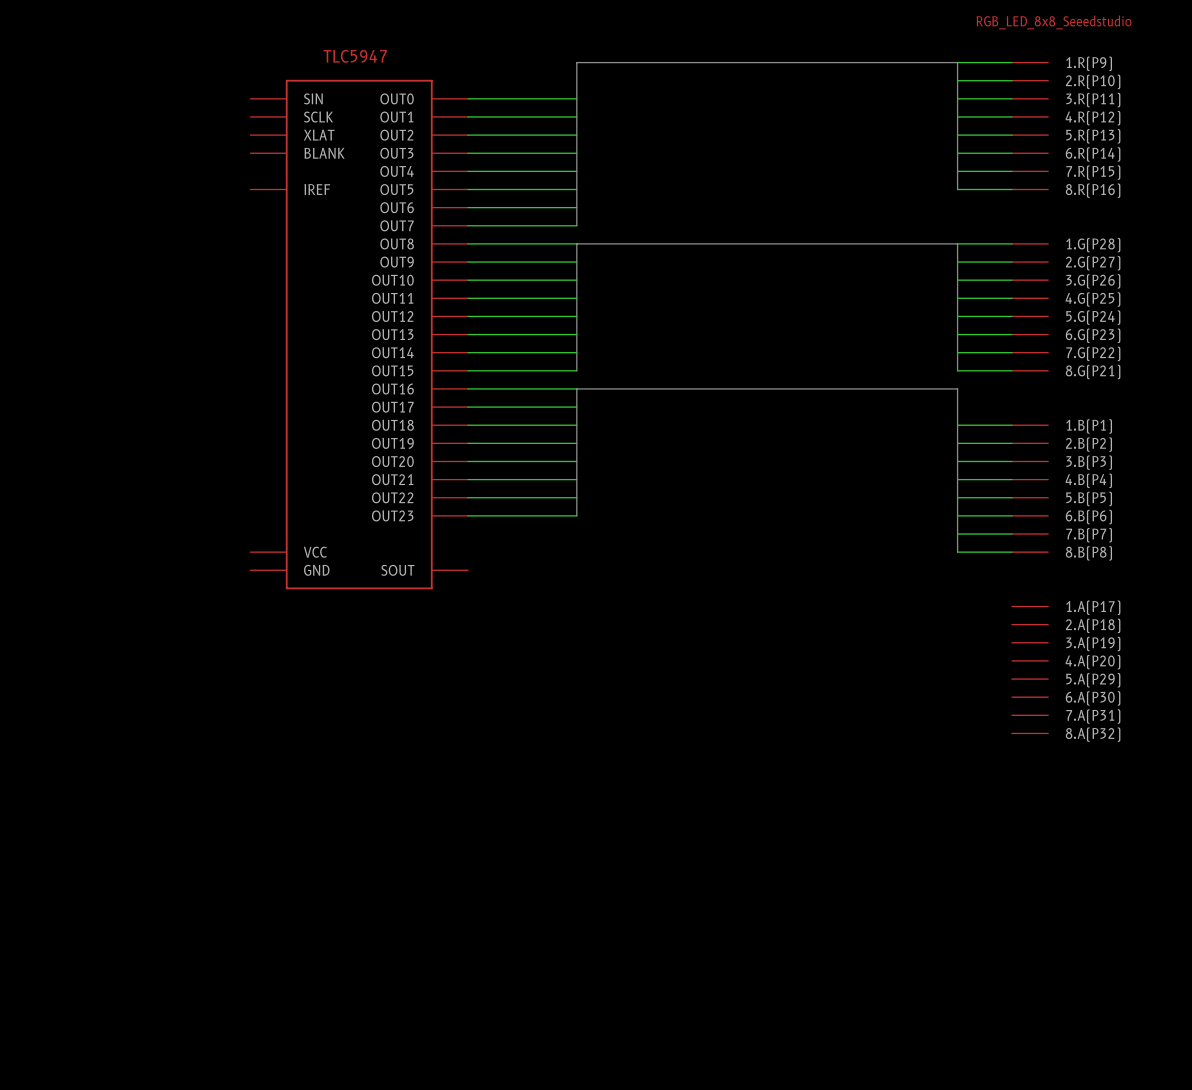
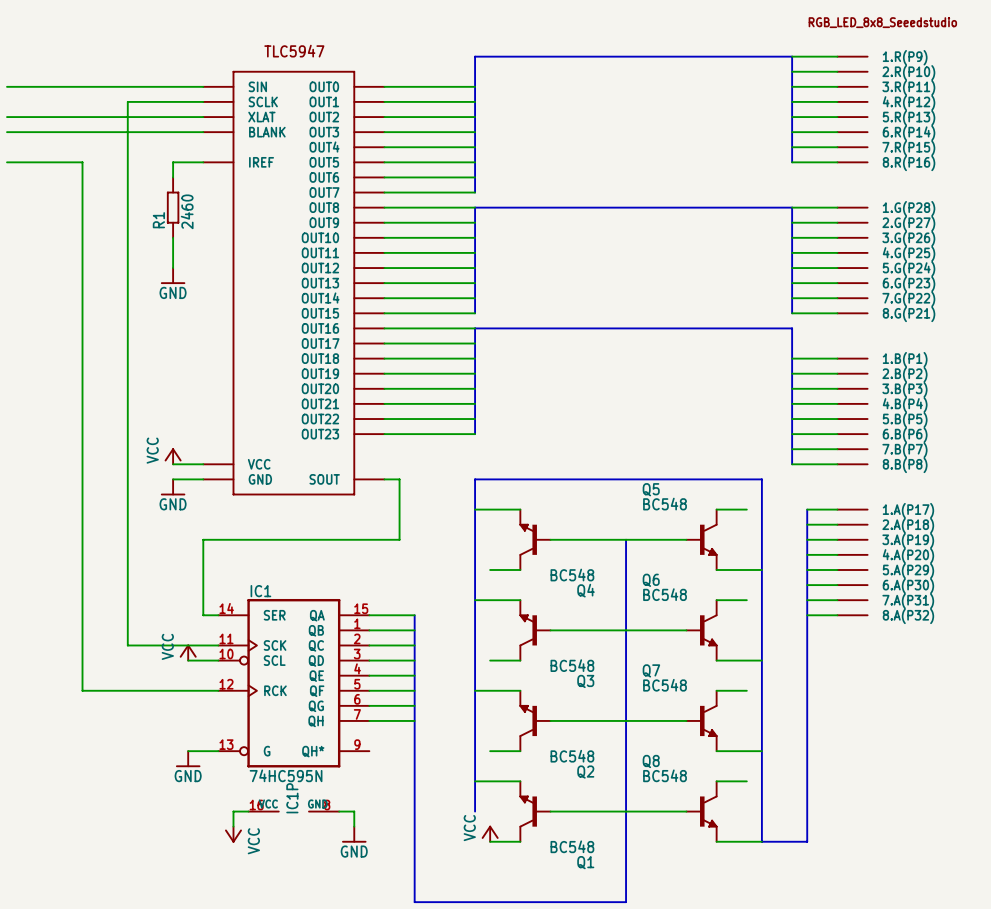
wire: none -> (7, 86) (203, 86)
wire: none -> (203, 101) (127, 101) (127, 645) (218, 645)
wire: none -> (7, 117) (203, 117)
wire: none -> (7, 132) (203, 132)
wire: none -> (7, 162) (82, 162) (82, 690) (218, 690)
wire: none -> (203, 162) (173, 162) (173, 177)
R1: none -> 2460 (173, 207)
wire: none -> (173, 237) (173, 268)
power symbol: none -> GND (173, 275)
power symbol: none -> VCC (173, 456)
wire: none -> (173, 464) (203, 464)
wire: none -> (173, 479) (203, 479)
wire: none -> (384, 479) (399, 479) (399, 539) (203, 539) (203, 615) (218, 615)
power symbol: none -> GND (173, 487)
wire: none -> (475, 509) (520, 509)
wire: none -> (716, 509) (746, 509)
bus: none -> (807, 509) (807, 841) (761, 841) (761, 479) (475, 479) (475, 811)
wire: none -> (807, 509) (837, 509)
wire: none -> (807, 524) (837, 524)
Q4: none -> BC548 (535, 539)
wire: none -> (550, 539) (686, 539)
bus: none -> (626, 539) (626, 902) (414, 902) (414, 615)
Q5: none -> BC548 (701, 539)
wire: none -> (807, 539) (837, 539)
wire: none -> (807, 554) (837, 554)
wire: none -> (490, 569) (520, 569)
wire: none -> (716, 569) (761, 569)
wire: none -> (807, 569) (837, 569)
wire: none -> (807, 585) (837, 585)
wire: none -> (475, 600) (520, 600)
wire: none -> (716, 600) (746, 600)
wire: none -> (807, 600) (837, 600)
wire: none -> (369, 615) (414, 615)
wire: none -> (807, 615) (837, 615)
wire: none -> (369, 630) (414, 630)
Q3: none -> BC548 (535, 630)
wire: none -> (550, 630) (686, 630)
Q6: none -> BC548 (701, 630)
wire: none -> (369, 645) (414, 645)
power symbol: none -> VCC (188, 652)
wire: none -> (188, 660) (218, 660)
wire: none -> (369, 660) (414, 660)
wire: none -> (490, 660) (520, 660)
wire: none -> (716, 660) (761, 660)
wire: none -> (369, 675) (414, 675)
IC1: none -> 74HC595N (293, 683)
wire: none -> (369, 690) (414, 690)
wire: none -> (475, 690) (520, 690)
wire: none -> (716, 690) (746, 690)
wire: none -> (369, 705) (414, 705)
wire: none -> (369, 720) (414, 720)
Q2: none -> BC548 (535, 720)
wire: none -> (550, 720) (686, 720)
Q7: none -> BC548 (701, 720)
wire: none -> (188, 751) (218, 751)
wire: none -> (490, 751) (520, 751)
wire: none -> (716, 751) (761, 751)
power symbol: none -> GND (188, 759)
wire: none -> (475, 781) (520, 781)
wire: none -> (716, 781) (746, 781)
wire: none -> (248, 811) (233, 811) (233, 826)
IC1P: none -> (293, 811)
wire: none -> (339, 811) (354, 811) (354, 826)
Q1: none -> BC548 (535, 811)
wire: none -> (550, 811) (686, 811)
Q8: none -> BC548 (701, 811)
power symbol: none -> VCC (490, 833)
power symbol: none -> VCC (233, 834)
power symbol: none -> GND (354, 834)
wire: none -> (490, 841) (520, 841)
wire: none -> (716, 841) (761, 841)

